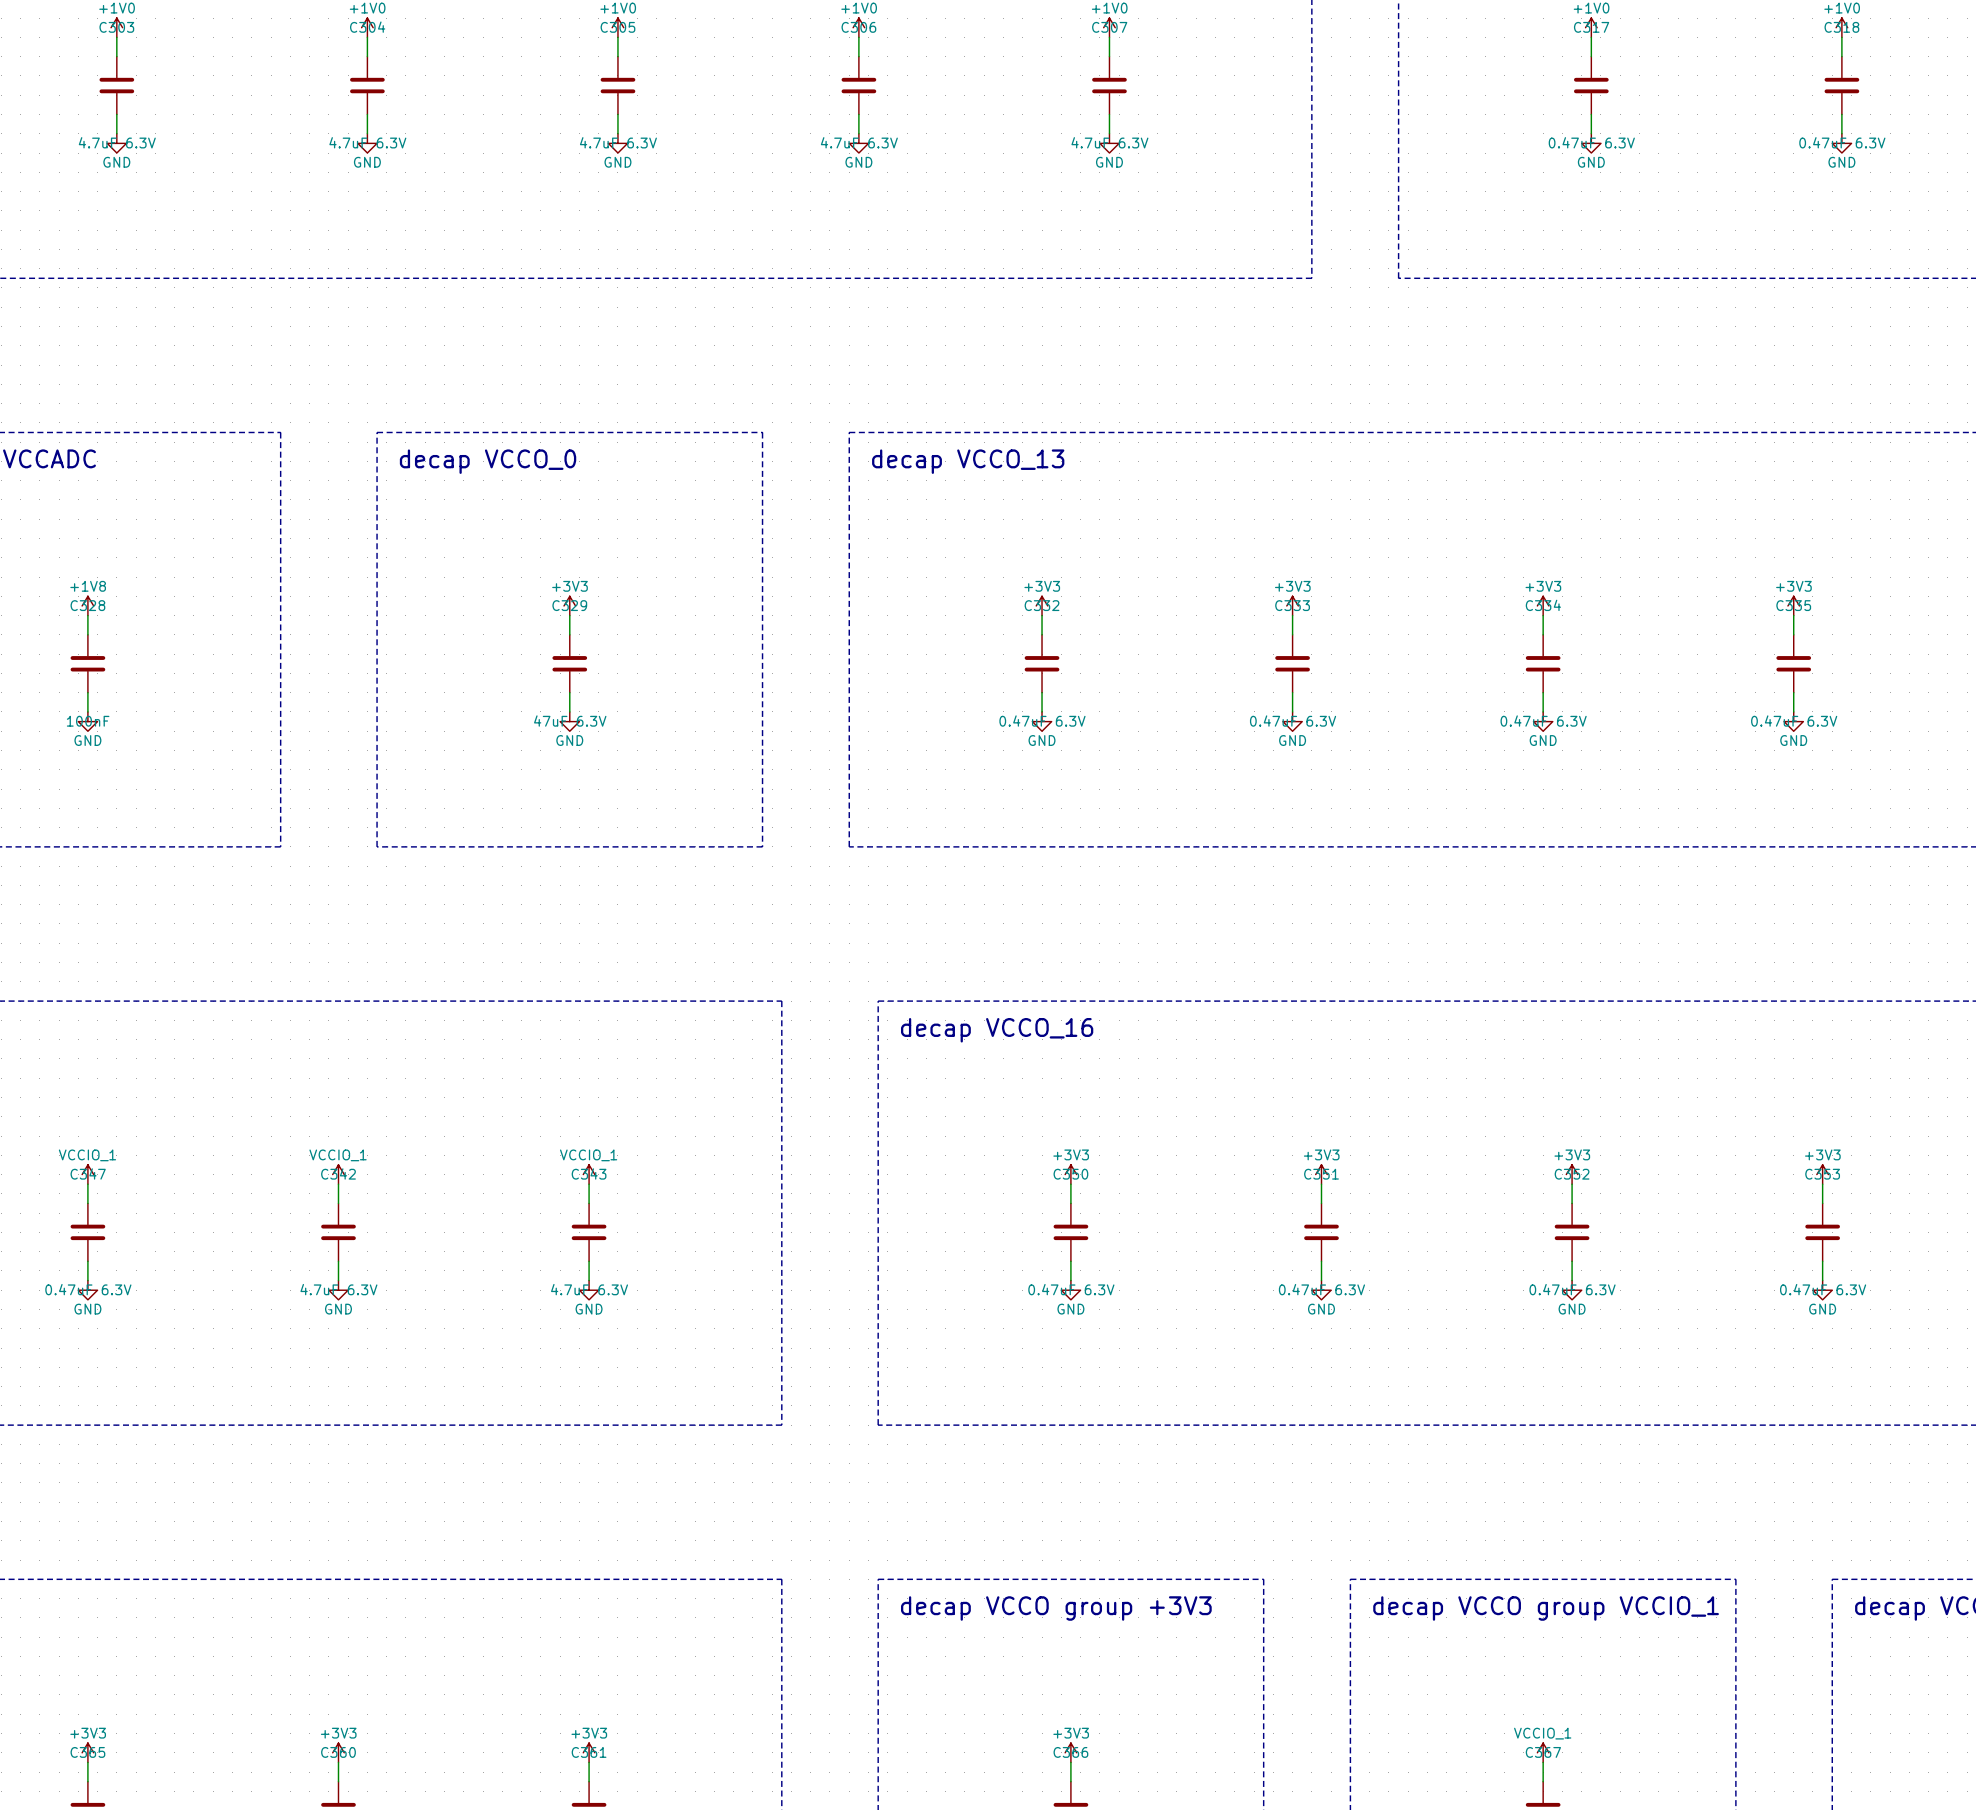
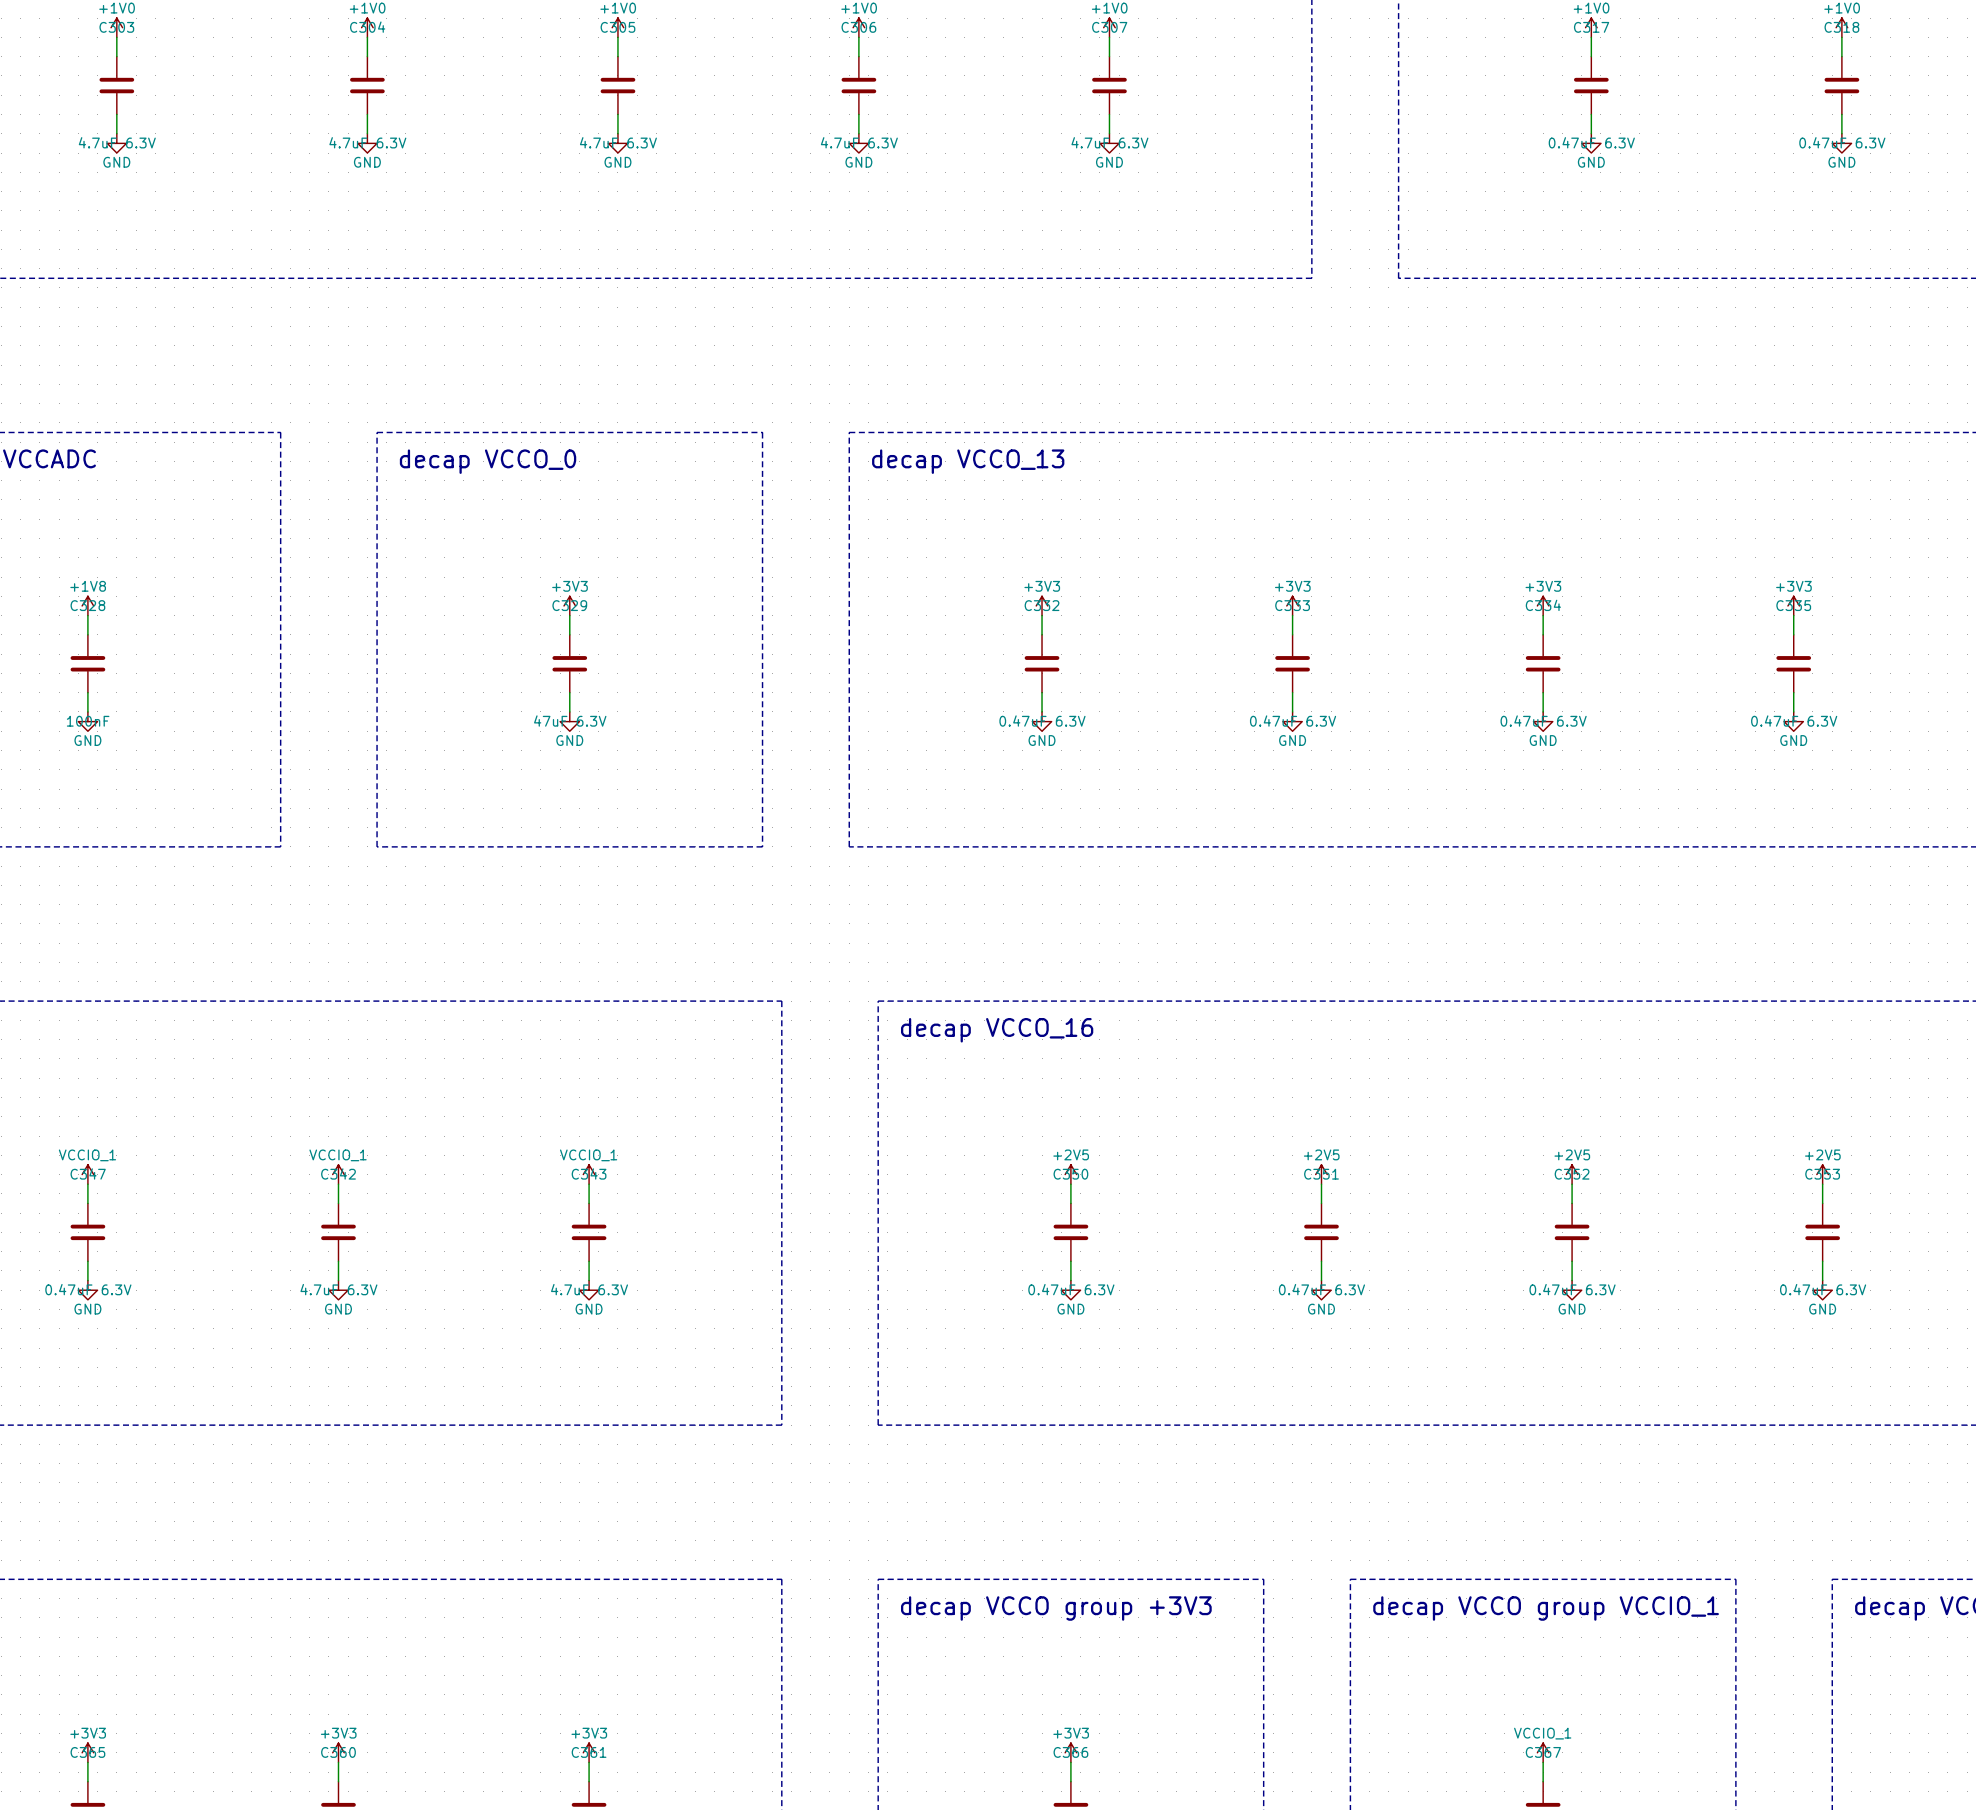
power symbol: +3V3 (1070, 1174) -> +2V5 (1070, 1174)
power symbol: +3V3 (1321, 1174) -> +2V5 (1321, 1174)
power symbol: +3V3 (1572, 1174) -> +2V5 (1572, 1174)
power symbol: +3V3 (1822, 1174) -> +2V5 (1822, 1174)

